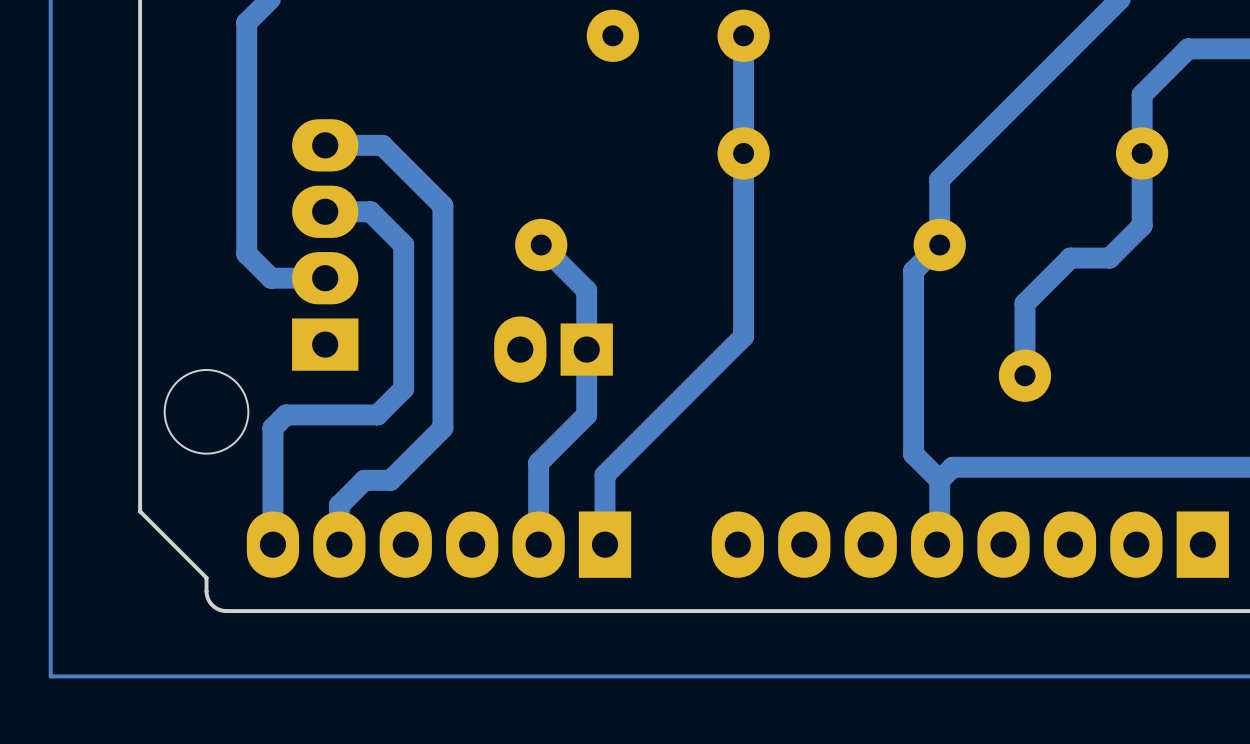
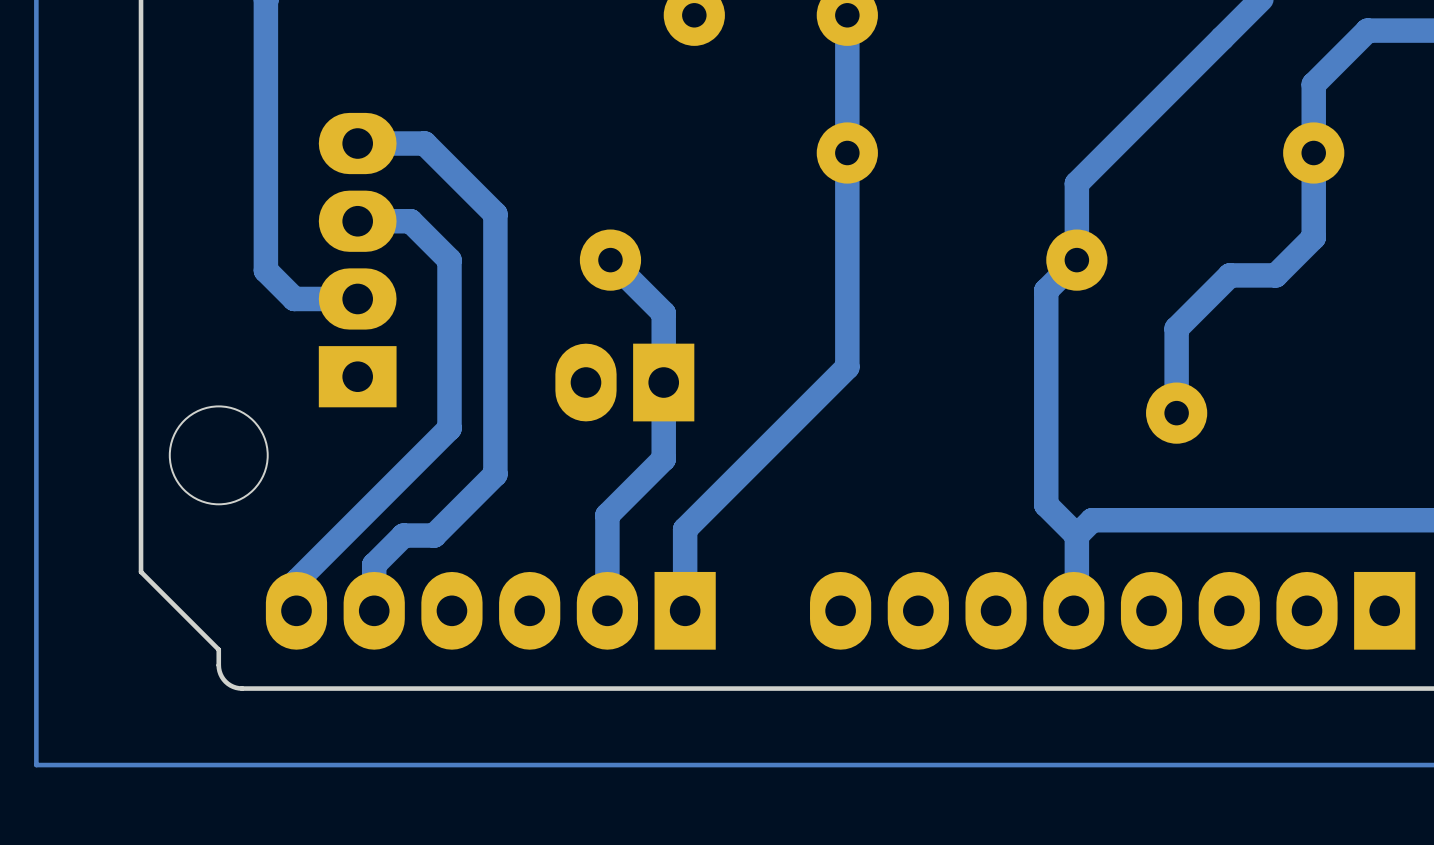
part footprint: [494, 316, 613, 383] -> [555, 343, 695, 422]
bottom track: (377, 414) (286, 414) (272, 428) (272, 519) -> (418, 459) (296, 581)

